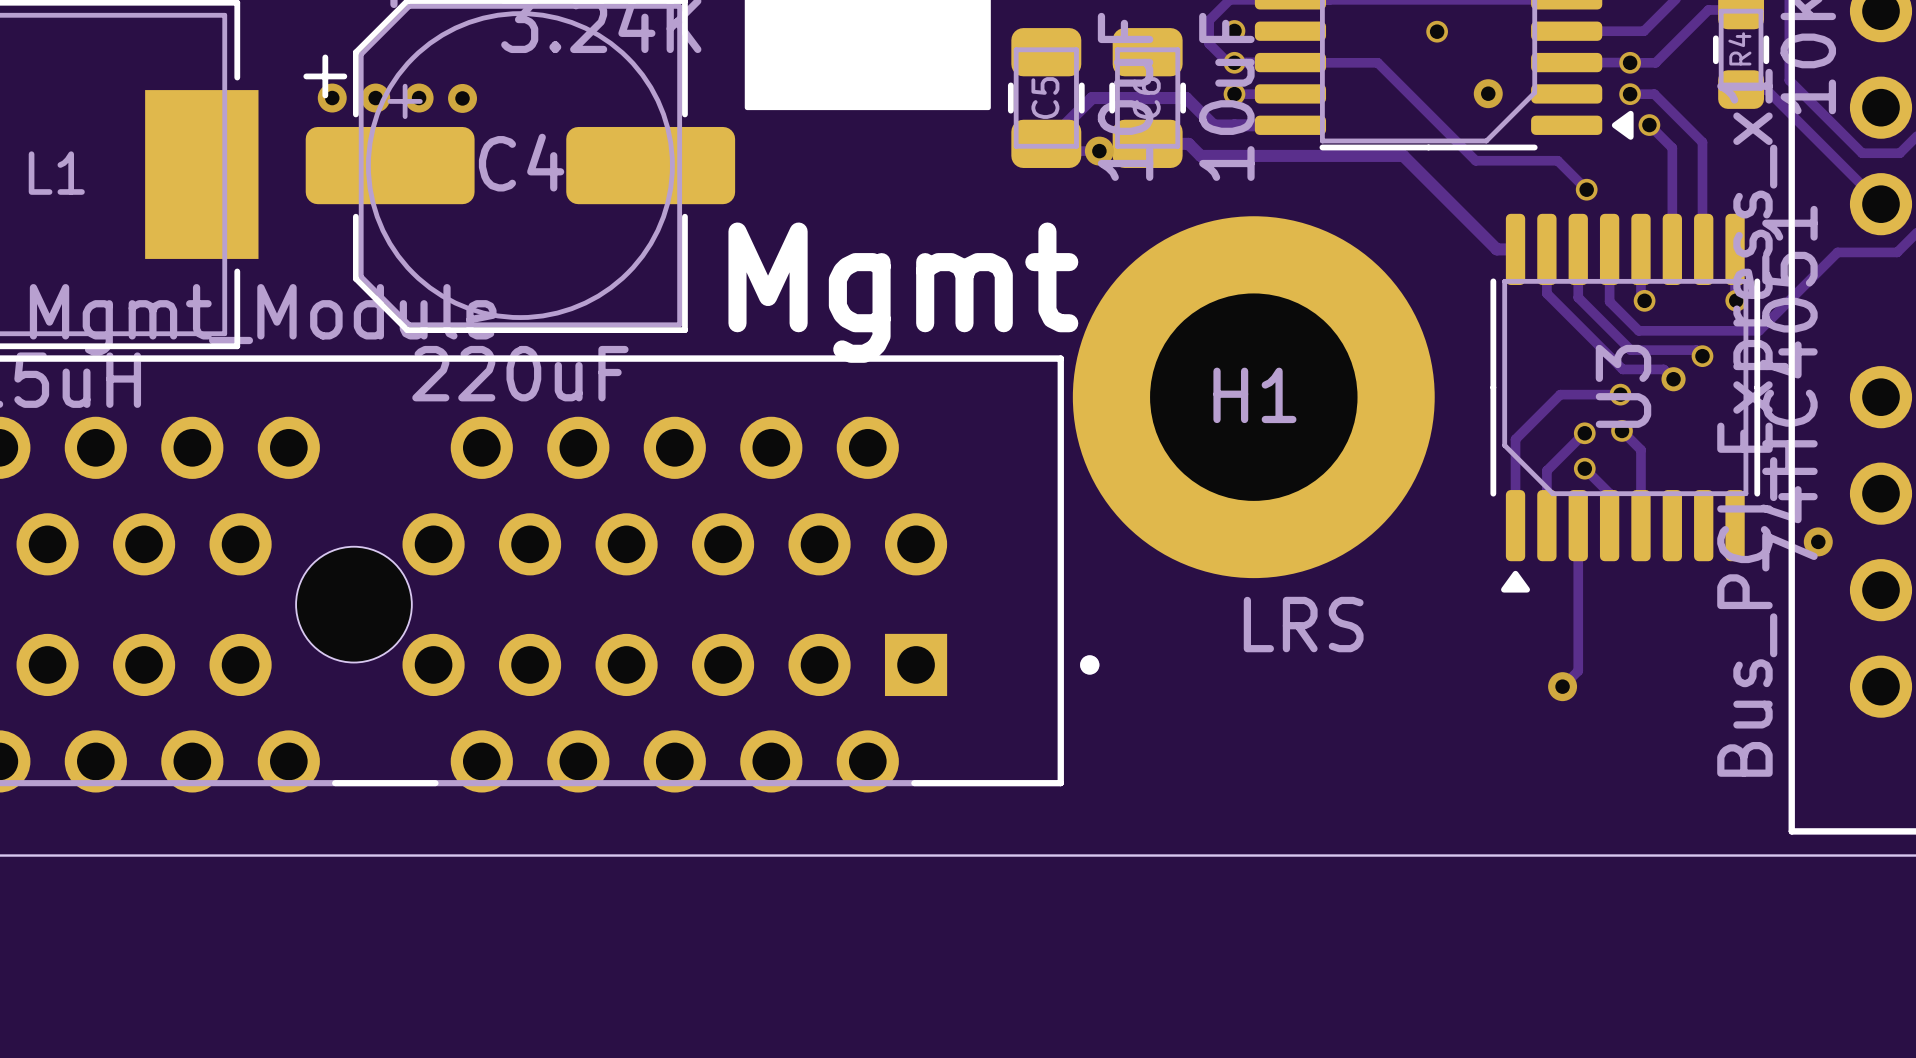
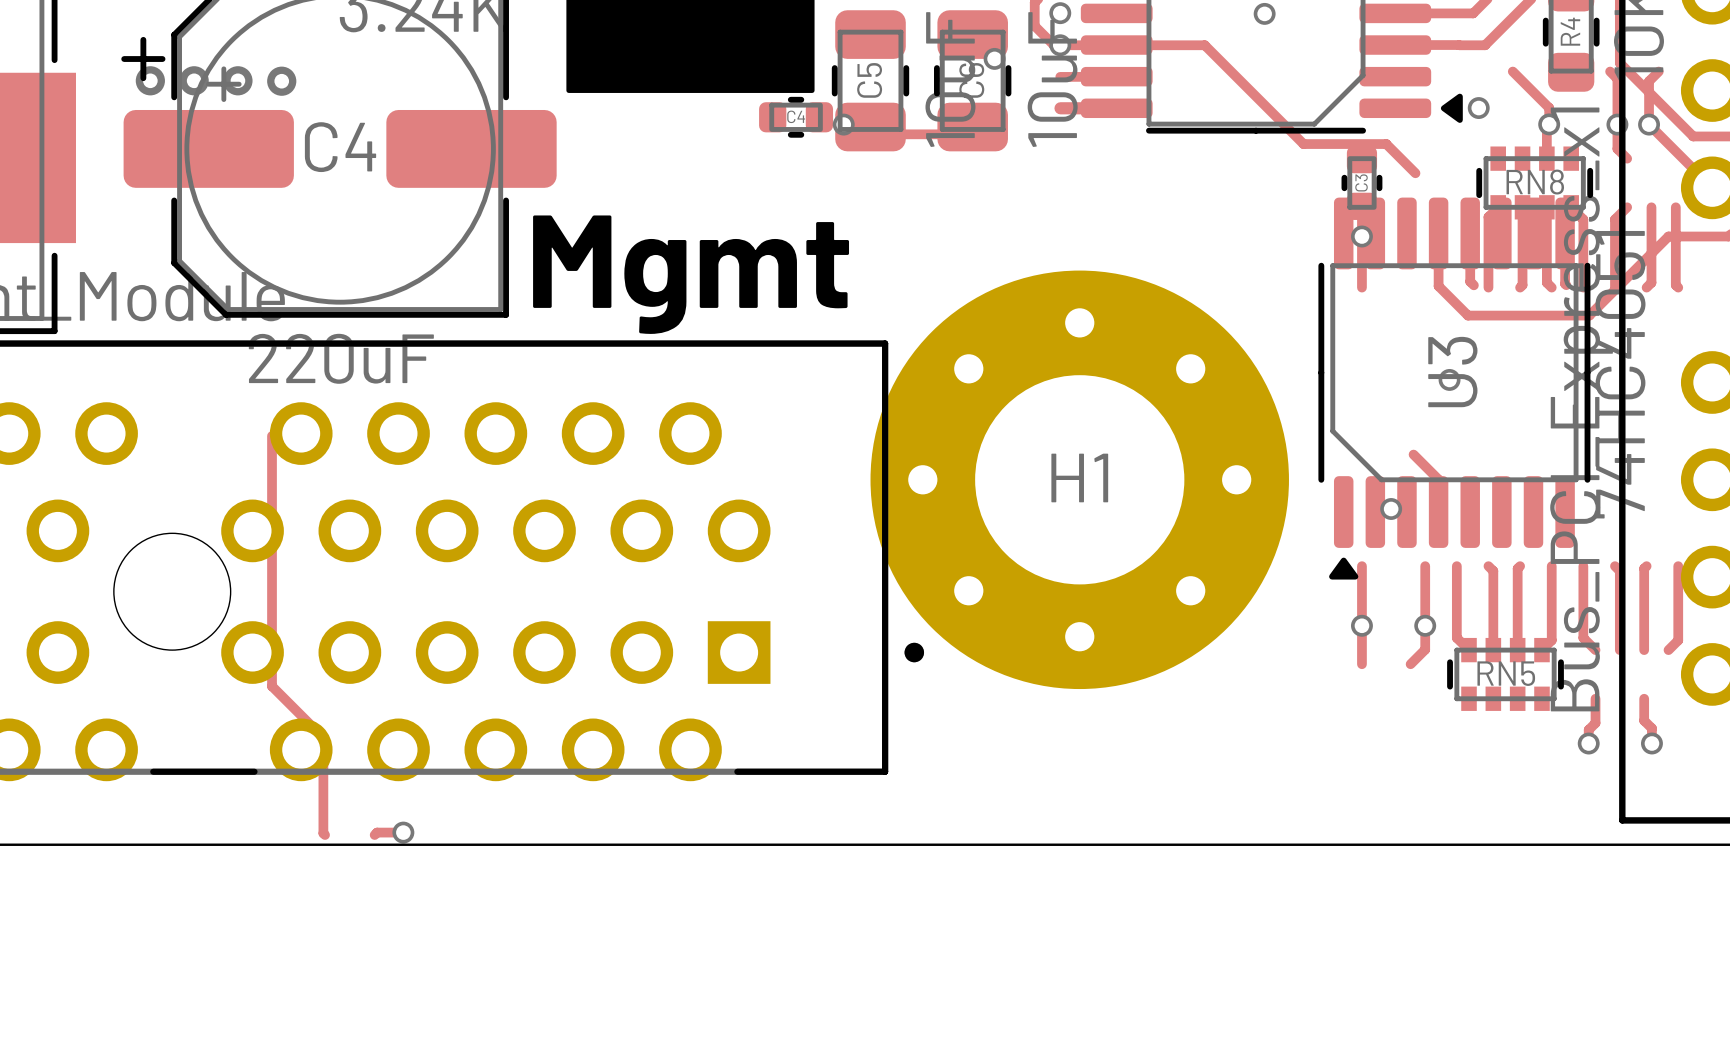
via: (1630, 62) -> none
track: none -> (1512, 71) (1549, 107) (1546, 158)
track: none -> (1610, 71) (1617, 78) (1617, 148) (1627, 158)
track: (1741, 89) (1766, 89) (1818, 141) -> (1658, 71) (1649, 81) (1649, 124)
via: (1488, 93) -> none
via position: (1234, 94) -> (994, 58)
track: (1630, 94) (1654, 94) (1702, 142) (1702, 252) -> none
via: (1630, 94) -> none
track: (1234, 125) (1213, 125) (1186, 98) (1092, 98) (1046, 143) -> none
track: (1649, 125) (1672, 147) (1672, 253) -> none
C4: none -> (796, 117)
via: none -> (843, 124)
via: none -> (1549, 124)
via: none -> (1617, 124)
via: none -> (1649, 124)
track: (1147, 143) (1188, 143) (1200, 155) (1403, 155) (1496, 249) (1515, 249) -> none
via: (1099, 151) -> none
via: (1586, 189) -> none
C3: none -> (1361, 182)
RN8: none -> (1534, 182)
H1 footprint: [1072, 216, 1435, 579] -> [870, 270, 1289, 690]
track: none -> (1361, 206) (1361, 287)
track: none -> (1498, 207) (1488, 217) (1488, 287)
track: none -> (1522, 207) (1522, 285) (1520, 287)
track: none -> (1546, 207) (1546, 282) (1551, 287)
track: none -> (1571, 207) (1583, 219) (1583, 287)
track: none -> (1627, 207) (1614, 219) (1614, 287)
track: none -> (1651, 207) (1651, 282) (1646, 287)
track: none -> (1675, 207) (1675, 285) (1678, 287)
track: (1546, 249) (1546, 293) (1622, 369) (1663, 369) (1673, 379) -> none
track: (1578, 249) (1578, 297) (1630, 350) (1696, 350) (1702, 356) -> none
via: none -> (1361, 236)
via: (1644, 300) -> none
via: (1736, 300) -> none
via: (1702, 356) -> none
via: (1673, 379) -> none
track: (1620, 394) (1560, 394) (1515, 439) (1515, 525) -> none
track: (1622, 430) (1640, 449) (1640, 525) -> none
via: (1622, 430) -> none
track: (1584, 433) (1546, 470) (1546, 525) -> none
via: (1584, 433) -> none
track: none -> (272, 436) (272, 686) (323, 737) (323, 833) (325, 835)
via: (1584, 468) -> none
via: none -> (1391, 508)
track: (1578, 525) (1578, 670) (1562, 686) -> none
via: (1818, 541) -> none
track: none -> (1361, 566) (1361, 664)
track: none -> (1425, 566) (1425, 649) (1410, 664)
track: none -> (1456, 566) (1456, 637) (1469, 650)
track: none -> (1488, 566) (1493, 571) (1493, 650)
track: none -> (1520, 566) (1517, 568) (1517, 650)
track: none -> (1551, 566) (1551, 640) (1542, 650)
track: none -> (1583, 566) (1583, 637) (1595, 650)
track: none -> (1614, 566) (1619, 571) (1619, 650)
track: none -> (1646, 566) (1644, 568) (1644, 650)
track: none -> (1678, 566) (1678, 640) (1668, 650)
H1 value: LRS (1303, 624) -> none
via: none -> (1361, 625)
via: none -> (1425, 625)
via: (1562, 686) -> none
RN5: none -> (1505, 674)
track: none -> (1595, 698) (1595, 723) (1588, 729) (1588, 743)
track: none -> (1644, 698) (1644, 720) (1651, 728) (1651, 743)
via: none -> (1588, 743)
via: none -> (1651, 743)
track: none -> (403, 832) (377, 832) (374, 835)
via: none -> (403, 832)

